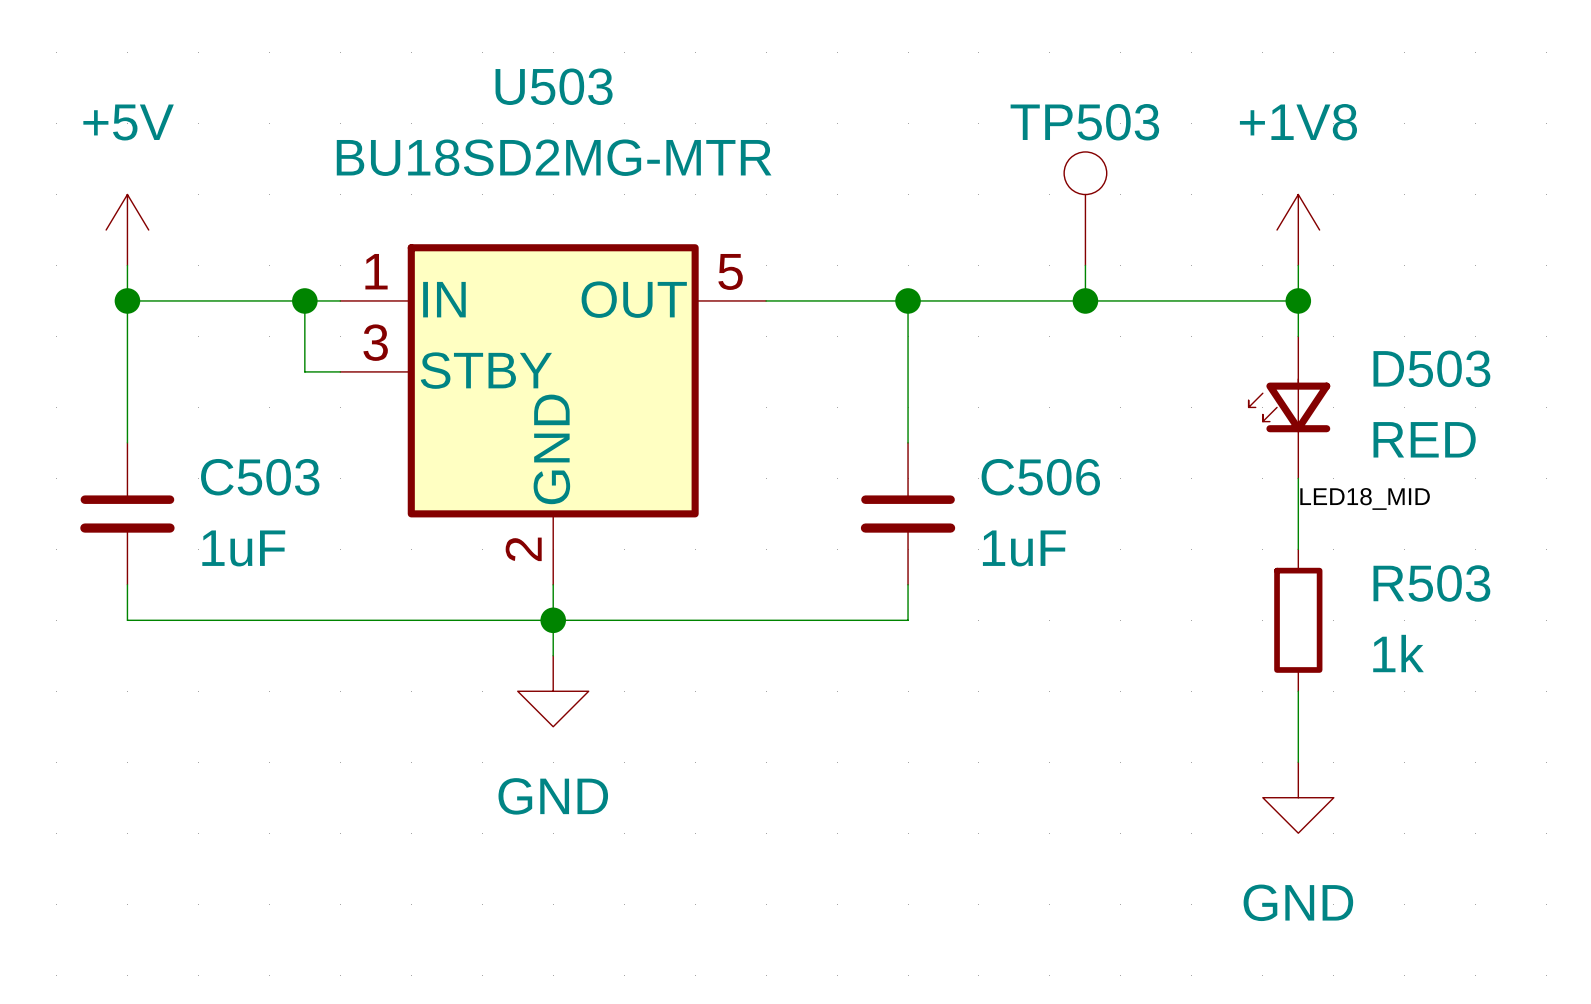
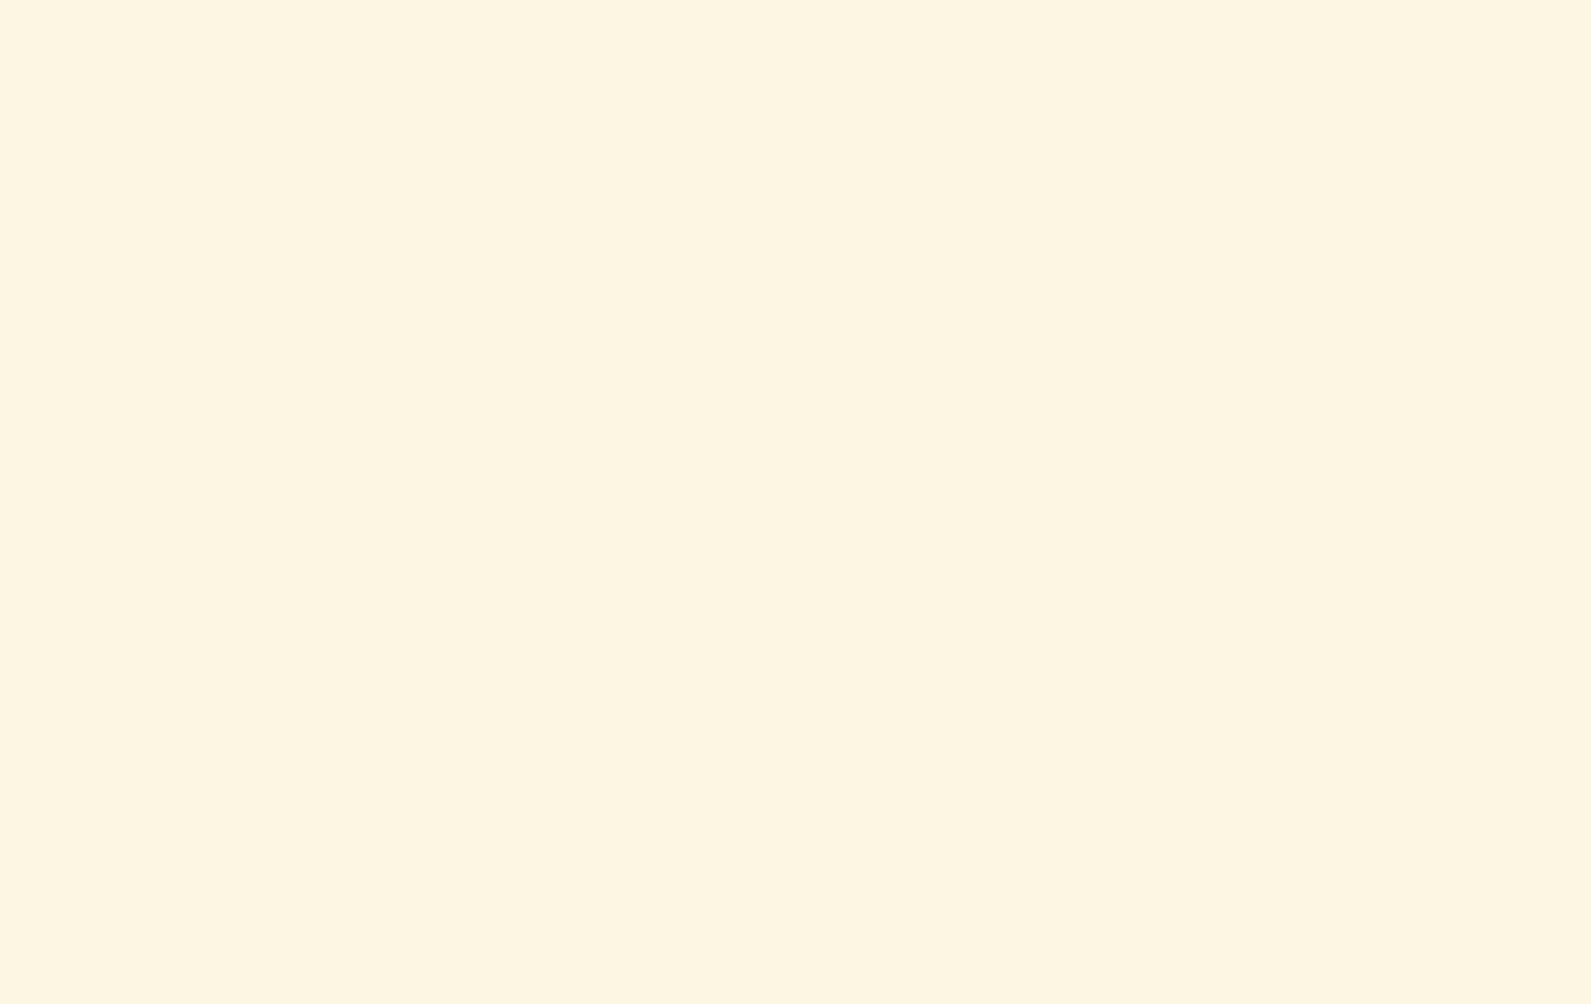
TP503: (1085, 208) -> none
power symbol: +5V (127, 230) -> none
power symbol: +1V8 (1298, 230) -> none
wire: (127, 265) (127, 442) -> none
wire: (1085, 265) (1085, 300) -> none
wire: (1298, 265) (1298, 336) -> none
wire: (127, 300) (340, 300) -> none
junction: (127, 300) -> none
wire: (304, 300) (304, 371) (340, 371) -> none
junction: (304, 300) -> none
wire: (766, 300) (1298, 300) -> none
wire: (908, 300) (908, 442) -> none
junction: (908, 300) -> none
junction: (1085, 300) -> none
junction: (1298, 300) -> none
D503: RED (1289, 407) -> none
U503: BU18SD2MG-MTR (553, 414) -> none
wire: (1298, 478) (1298, 549) -> none
label: LED18_MID (1365, 498) -> none
C503: 1uF (127, 513) -> none
C506: 1uF (908, 513) -> none
wire: (127, 584) (127, 620) (908, 620) (908, 584) -> none
wire: (553, 584) (553, 655) -> none
junction: (553, 620) -> none
R503: 1k (1298, 620) -> none
power symbol: GND (553, 691) -> none
wire: (1298, 691) (1298, 762) -> none
power symbol: GND (1298, 797) -> none

